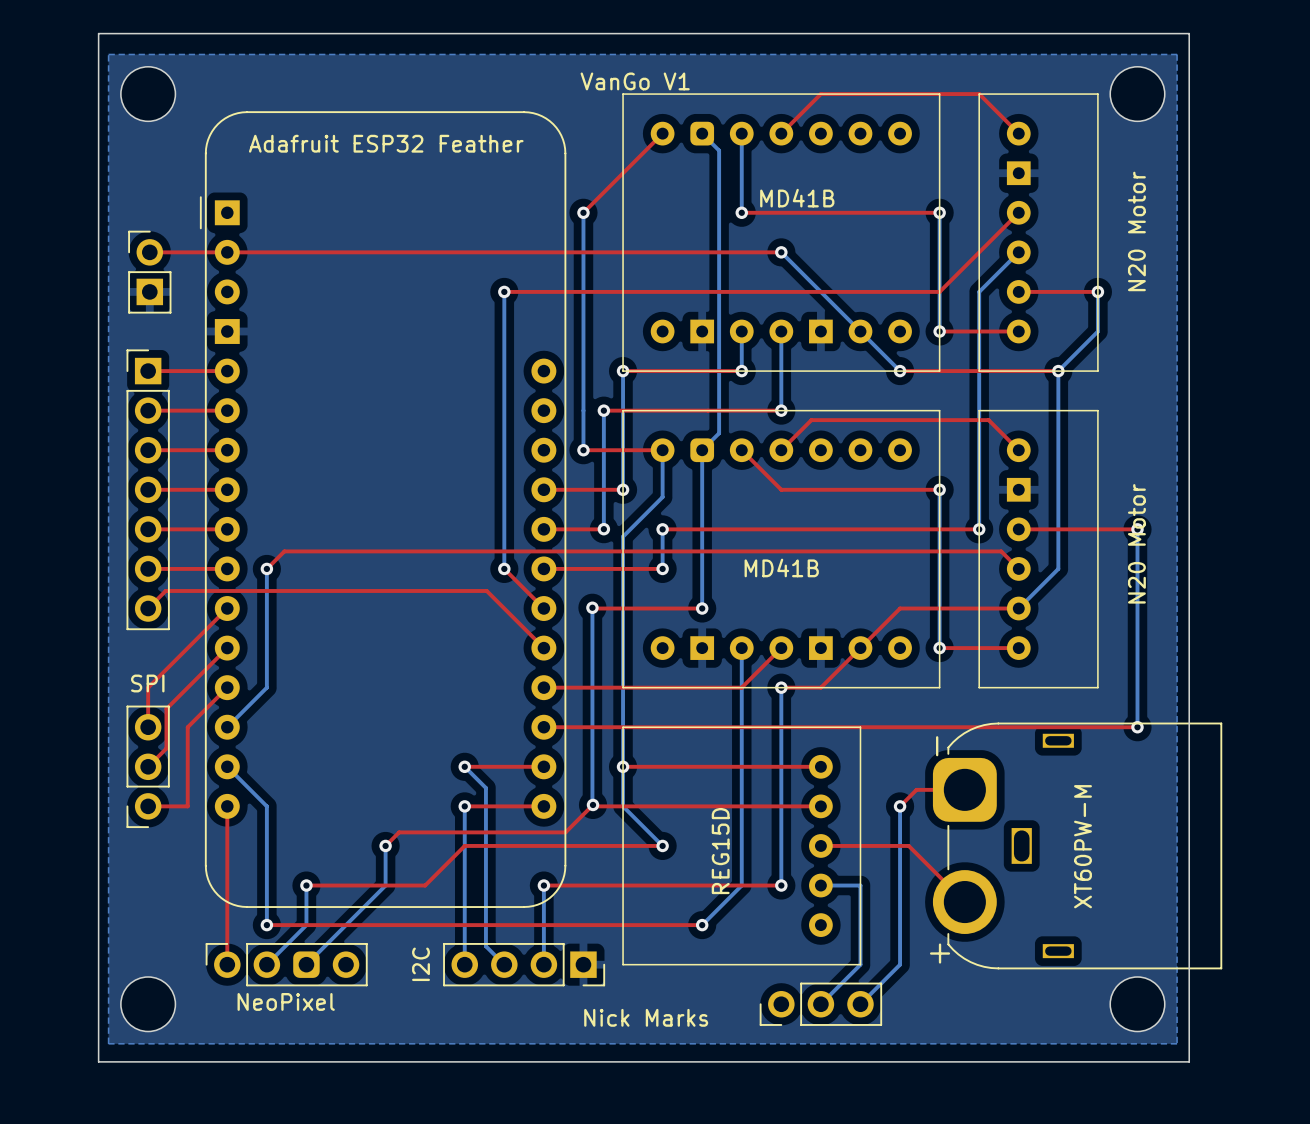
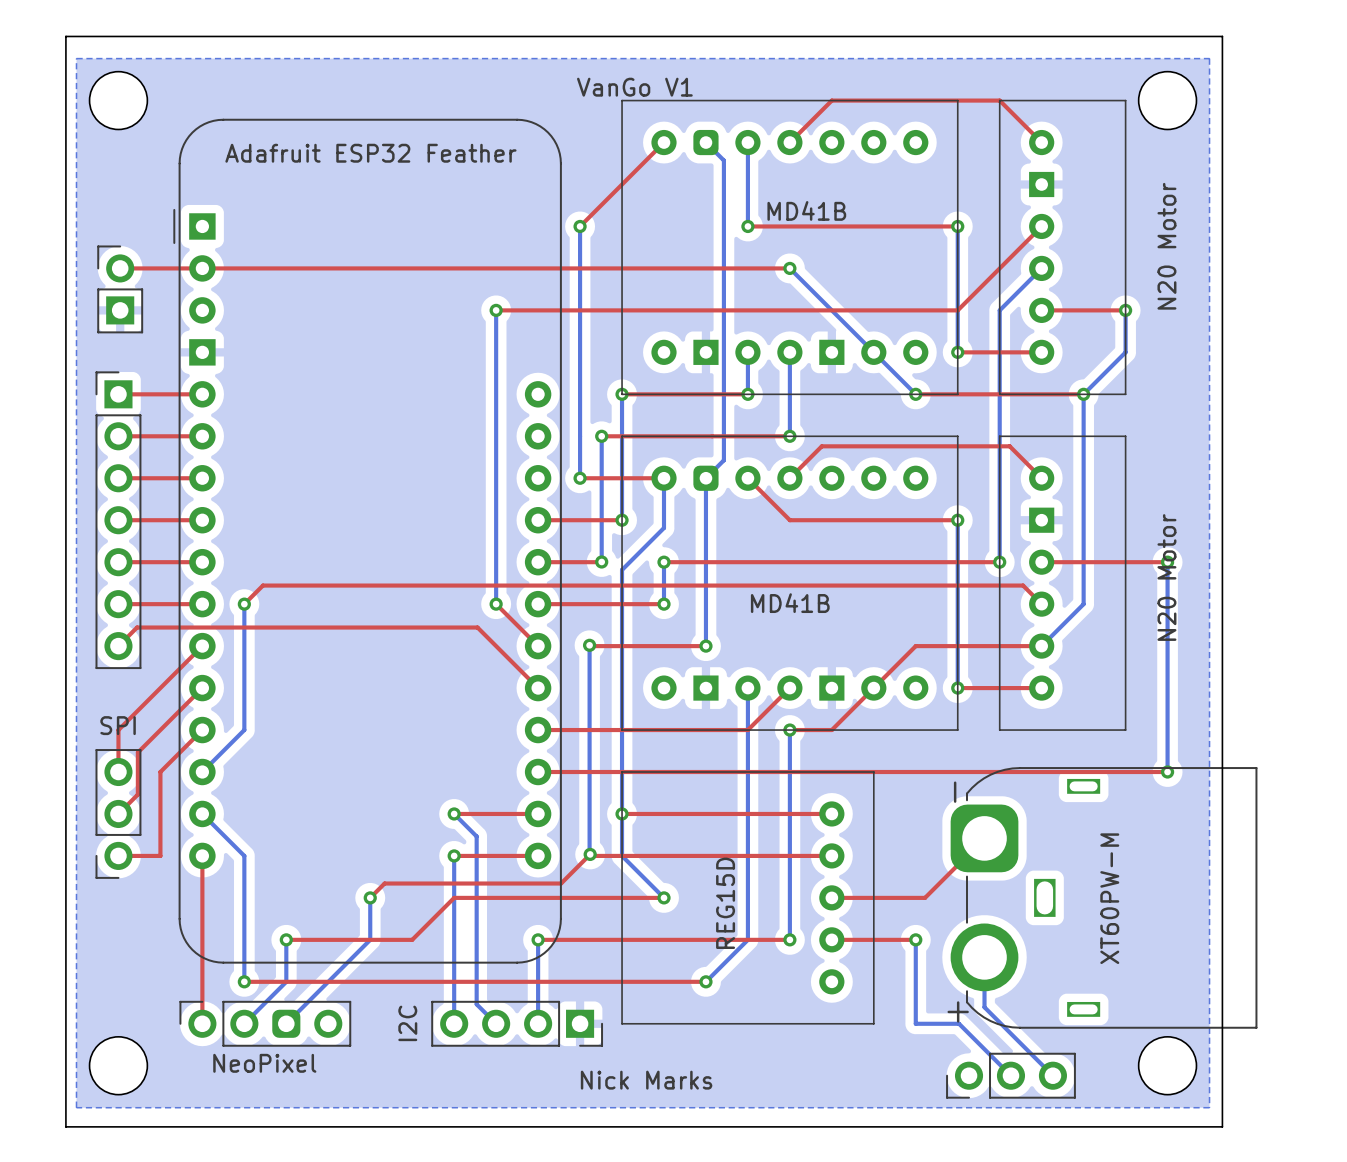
top track: (964, 789) (916, 789) (900, 806) -> (984, 838) (925, 897)
bottom track: (900, 806) (900, 885) -> none
via position: (900, 806) -> (915, 939)
top track: (908, 845) (964, 902) -> none
top track: none -> (831, 939) (915, 939)
bottom track: (820, 885) (860, 885) (860, 964) (820, 1004) -> none
bottom track: none -> (984, 957) (984, 1007) (1052, 1075)
bottom track: (900, 964) (860, 1004) -> (915, 1023) (959, 1023) (1010, 1075)
part position: (820, 1004) -> (1010, 1075)

